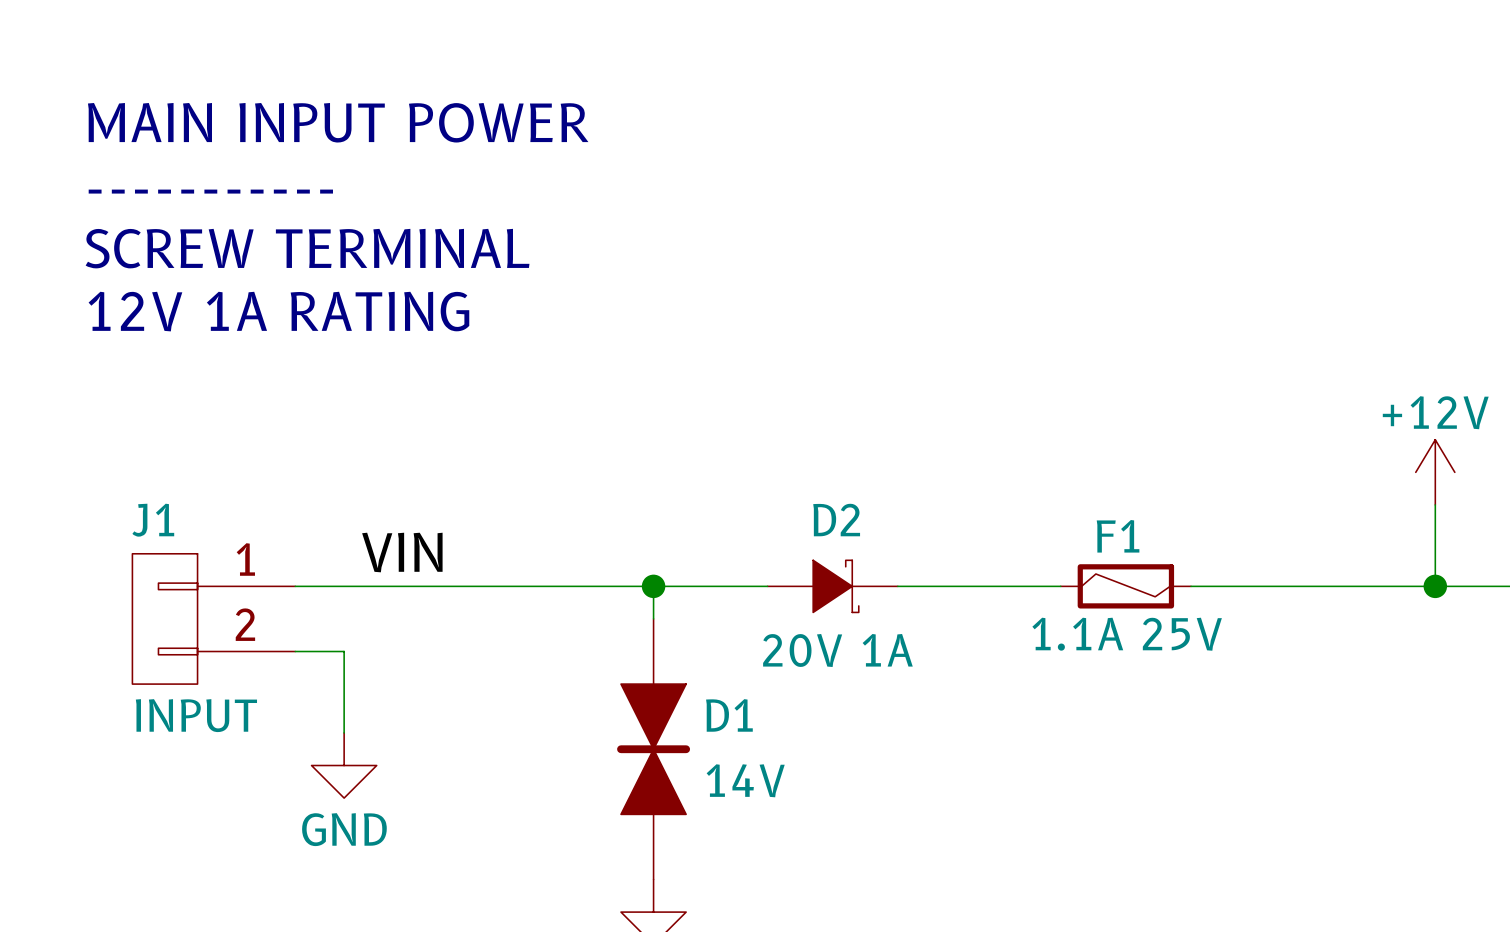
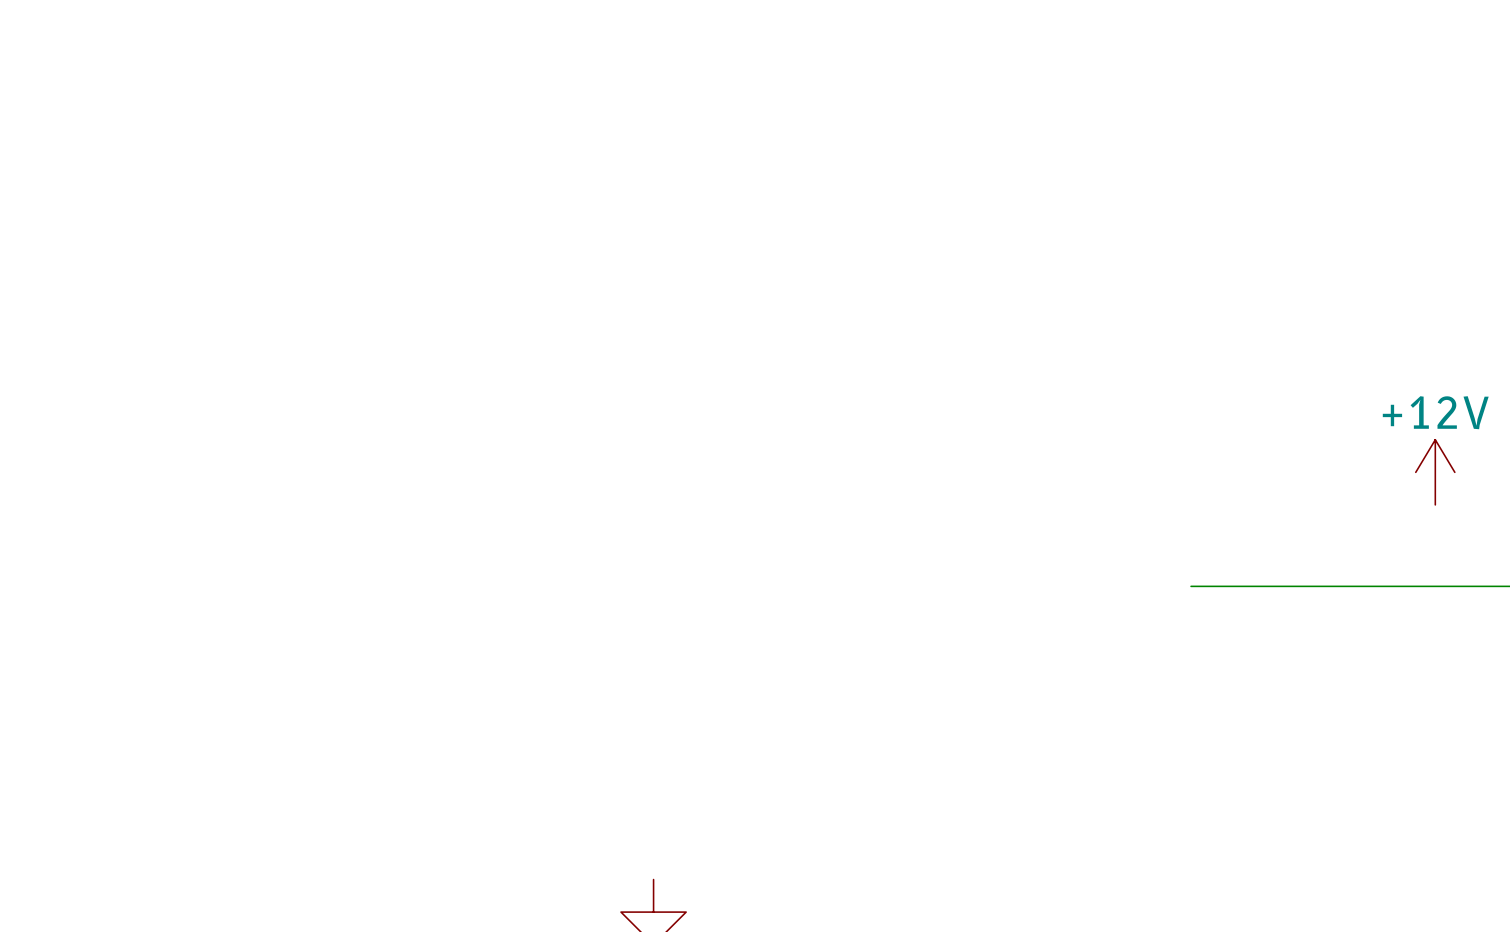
text: MAIN INPUT POWER (338, 122) -> none
text: ----------- (210, 191) -> none
text: SCREW TERMINAL (307, 248) -> none
text: 12V 1A RATING (278, 311) -> none
wire: (1435, 504) (1435, 586) -> none
label: VIN (402, 552) -> none
wire: (295, 586) (767, 586) -> none
wire: (653, 586) (653, 618) -> none
junction: (653, 586) -> none
D2: 20V 1A (832, 586) -> none
wire: (897, 586) (1060, 586) -> none
F1: 1.1A 25V (1125, 586) -> none
junction: (1435, 586) -> none
J1: INPUT (213, 618) -> none
wire: (295, 651) (344, 651) (344, 732) -> none
D1: 14V (653, 749) -> none
power symbol: GND (344, 765) -> none

